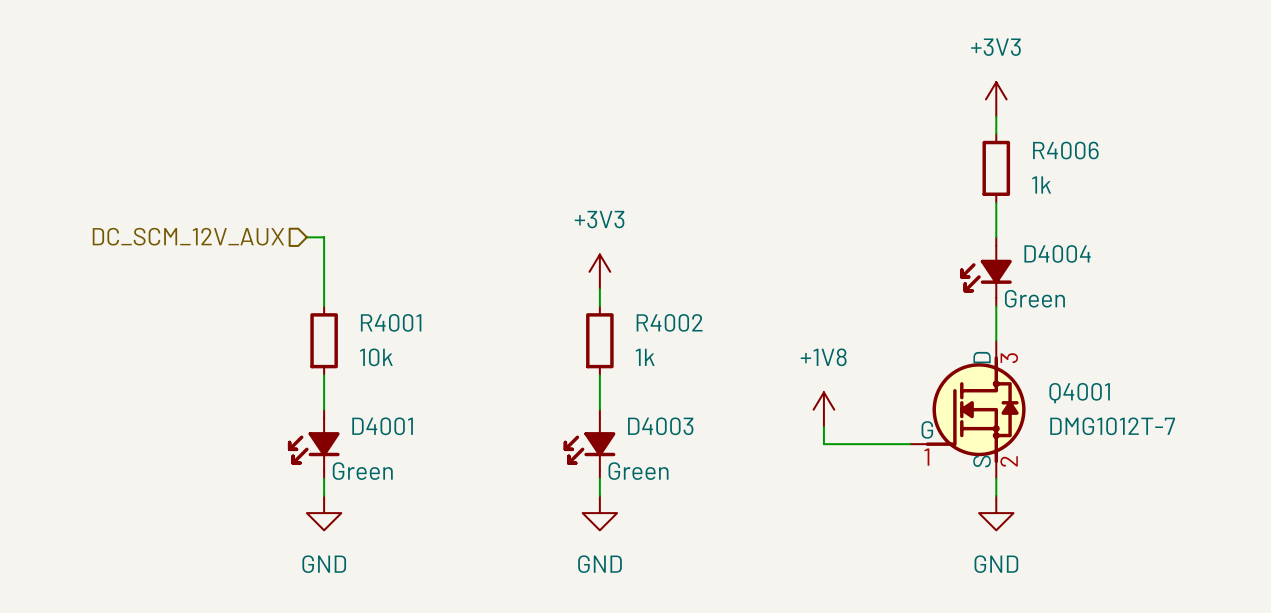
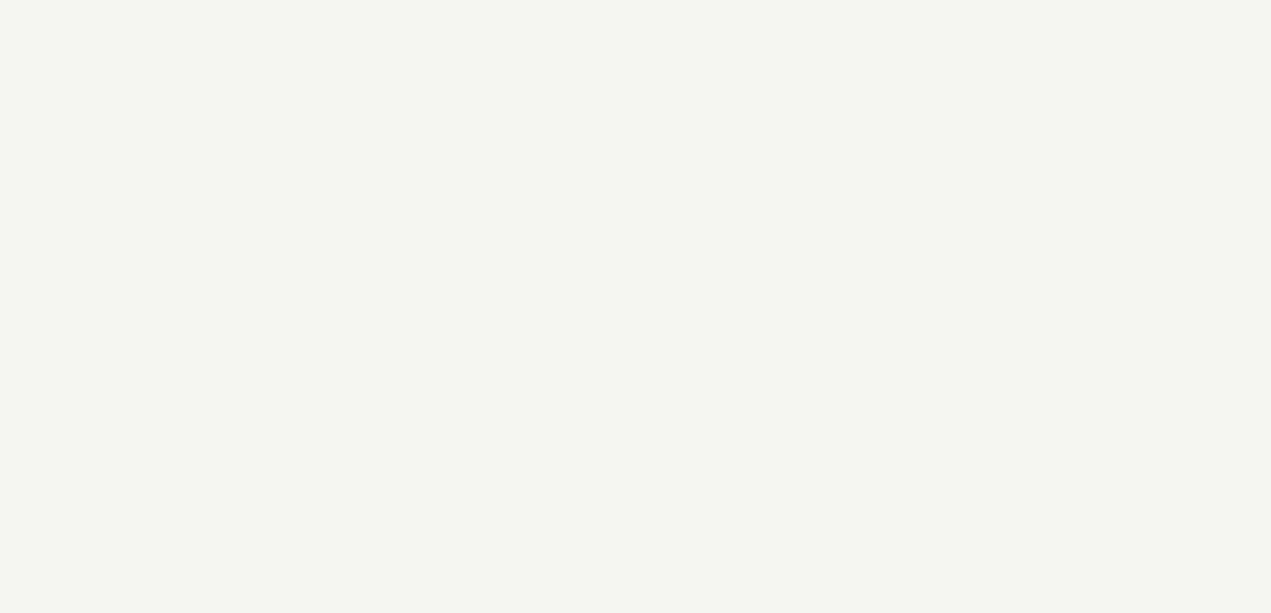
power symbol: +3V3 (996, 99) -> none
wire: (996, 116) (996, 133) -> none
R4006: (996, 168) -> none
wire: (996, 202) (996, 237) -> none
hierarchical label: DC_SCM_12V_AUX (188, 236) -> none
wire: (306, 237) (324, 237) (324, 306) -> none
power symbol: +3V3 (599, 271) -> none
D4004: (985, 271) -> none
wire: (599, 289) (599, 306) -> none
wire: (996, 306) (996, 340) -> none
R4001: (324, 340) -> none
R4002: (599, 340) -> none
wire: (324, 375) (324, 409) -> none
wire: (599, 375) (599, 409) -> none
power symbol: +1V8 (823, 409) -> none
Q4001: (967, 409) -> none
wire: (823, 426) (823, 444) (910, 444) -> none
D4001: (313, 444) -> none
D4003: (589, 444) -> none
wire: (324, 478) (324, 495) -> none
wire: (599, 478) (599, 495) -> none
wire: (996, 478) (996, 495) -> none
power symbol: GND (324, 513) -> none
power symbol: GND (599, 513) -> none
power symbol: GND (996, 513) -> none

